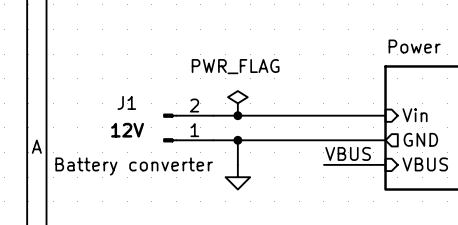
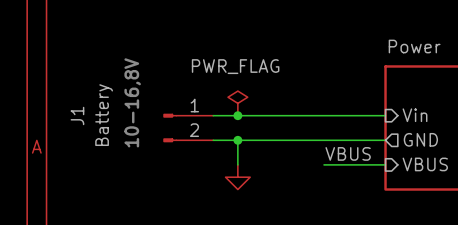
J1 name position: J1 (126, 102) -> J1 (77, 115)
text: none -> 10-16,8V (132, 102)
J1 flip: as is (170, 127) -> up-down (170, 127)
text: 12V (127, 130) -> none
J1 value: Battery converter (134, 166) -> Battery (104, 115)

